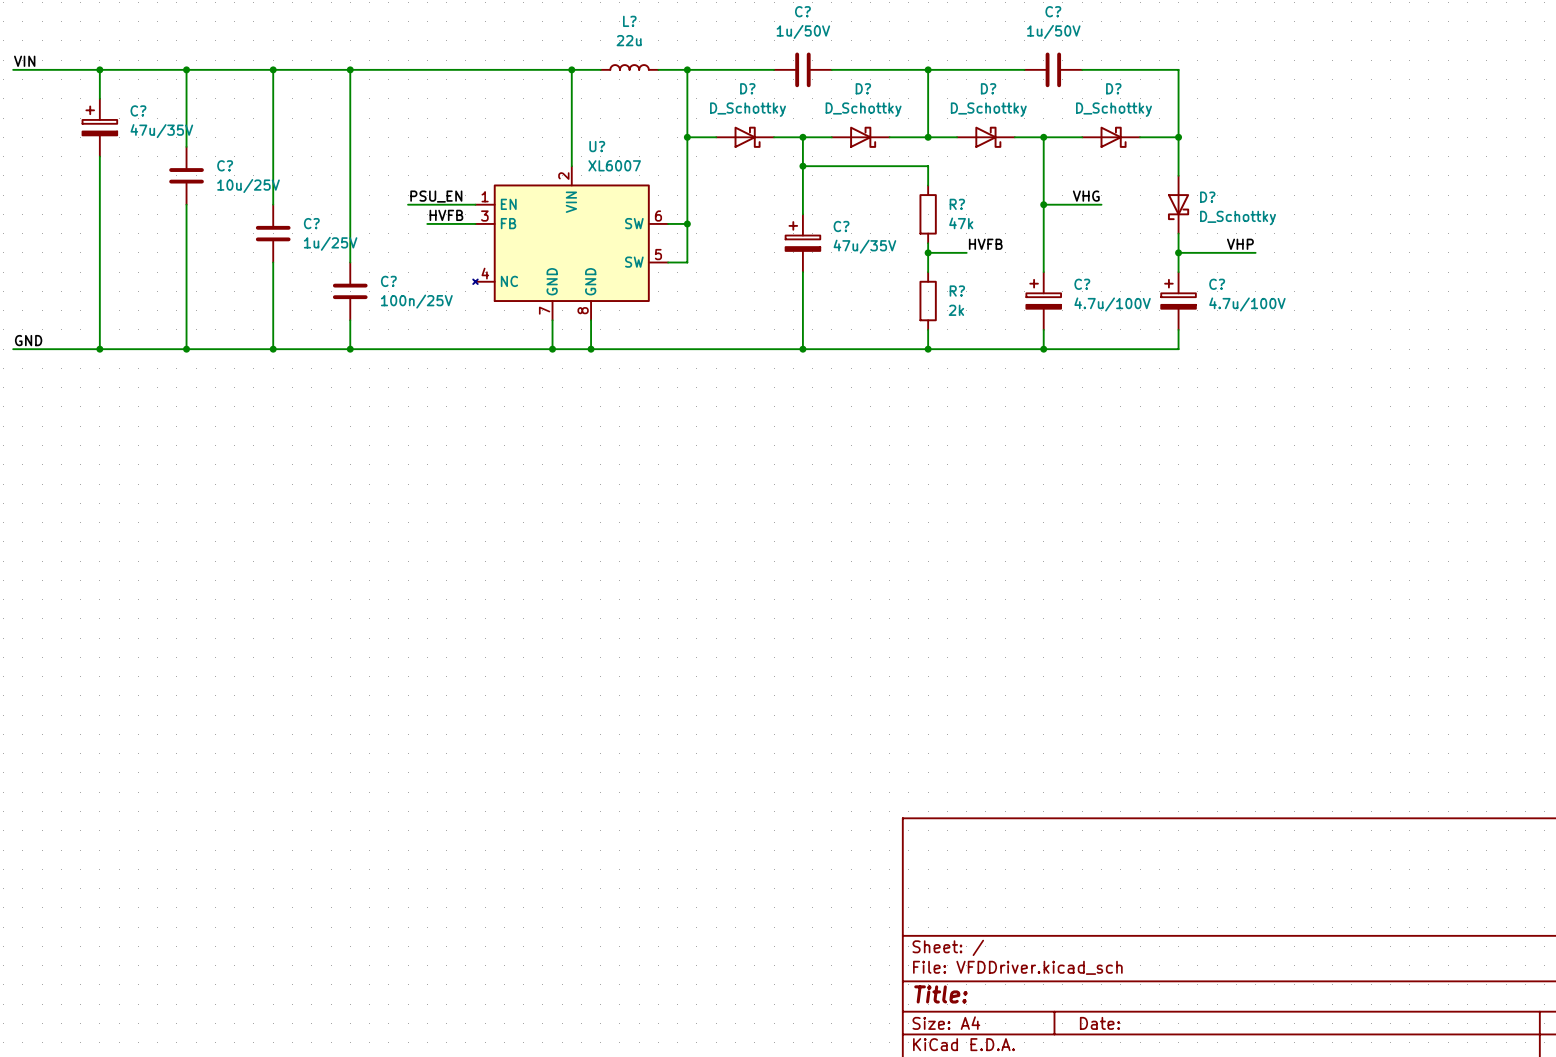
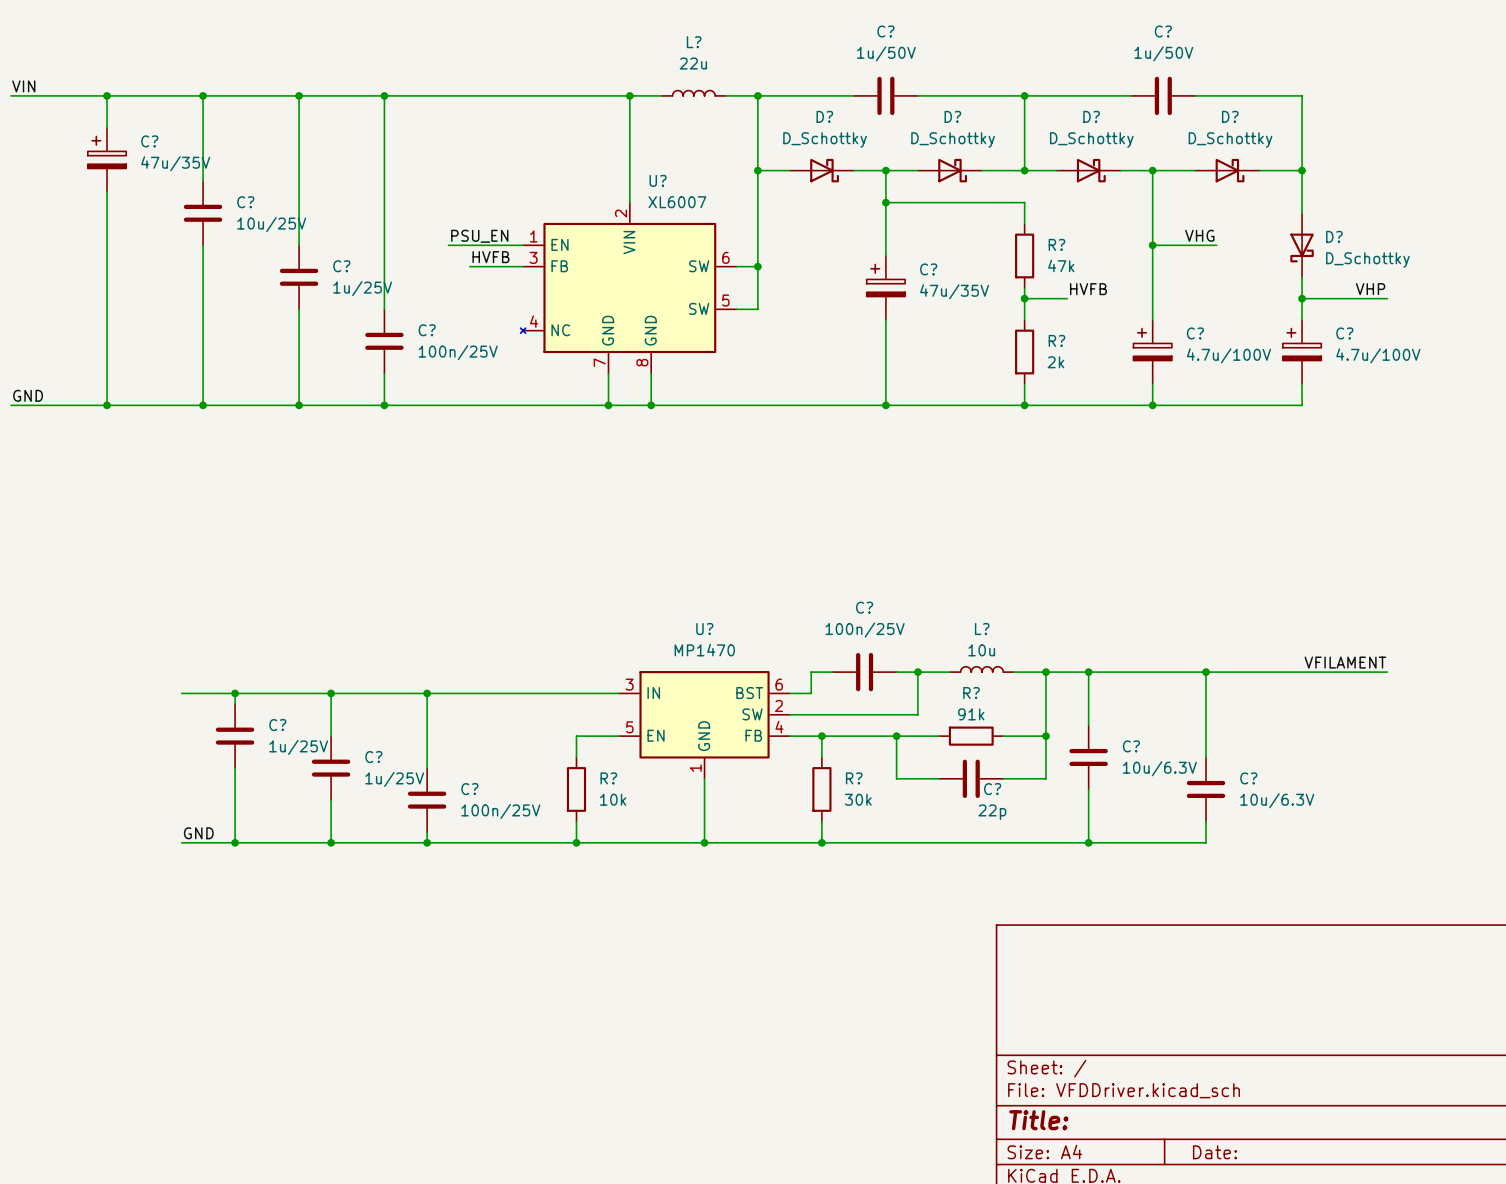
label: none -> VFILAMENT (1345, 662)
L?: none -> 10u (981, 669)
wire: none -> (832, 672) (811, 672) (811, 693) (789, 693)
C?: none -> 100n/25V (864, 672)
wire: none -> (896, 672) (949, 672)
wire: none -> (917, 672) (917, 714) (789, 714)
junction: none -> (917, 672)
wire: none -> (1013, 672) (1387, 672)
wire: none -> (1045, 672) (1045, 778) (1003, 778)
junction: none -> (1045, 672)
wire: none -> (1088, 672) (1088, 725)
junction: none -> (1088, 672)
wire: none -> (1206, 672) (1206, 757)
junction: none -> (1206, 672)
wire: none -> (181, 693) (619, 693)
wire: none -> (235, 693) (235, 704)
junction: none -> (235, 693)
wire: none -> (331, 693) (331, 736)
junction: none -> (331, 693)
wire: none -> (427, 693) (427, 768)
junction: none -> (427, 693)
U?: none -> MP1470 (704, 724)
C?: none -> 1u/25V (235, 736)
wire: none -> (619, 736) (576, 736) (576, 757)
wire: none -> (789, 736) (939, 736)
wire: none -> (821, 736) (821, 757)
junction: none -> (821, 736)
wire: none -> (896, 736) (896, 778) (939, 778)
junction: none -> (896, 736)
R?: none -> 91k (971, 736)
wire: none -> (1003, 736) (1045, 736)
junction: none -> (1045, 736)
C?: none -> 10u/6.3V (1088, 757)
wire: none -> (235, 768) (235, 842)
C?: none -> 1u/25V (331, 768)
wire: none -> (704, 778) (704, 842)
C?: none -> 22p (971, 778)
R?: none -> 10k (576, 789)
R?: none -> 30k (821, 789)
wire: none -> (1088, 789) (1088, 842)
C?: none -> 10u/6.3V (1206, 789)
wire: none -> (331, 800) (331, 842)
C?: none -> 100n/25V (427, 800)
wire: none -> (576, 821) (576, 842)
wire: none -> (821, 821) (821, 842)
wire: none -> (1206, 821) (1206, 842) (181, 842)
wire: none -> (427, 832) (427, 842)
label: none -> GND (198, 833)
junction: none -> (235, 842)
junction: none -> (331, 842)
junction: none -> (427, 842)
junction: none -> (576, 842)
junction: none -> (704, 842)
junction: none -> (821, 842)
junction: none -> (1088, 842)

